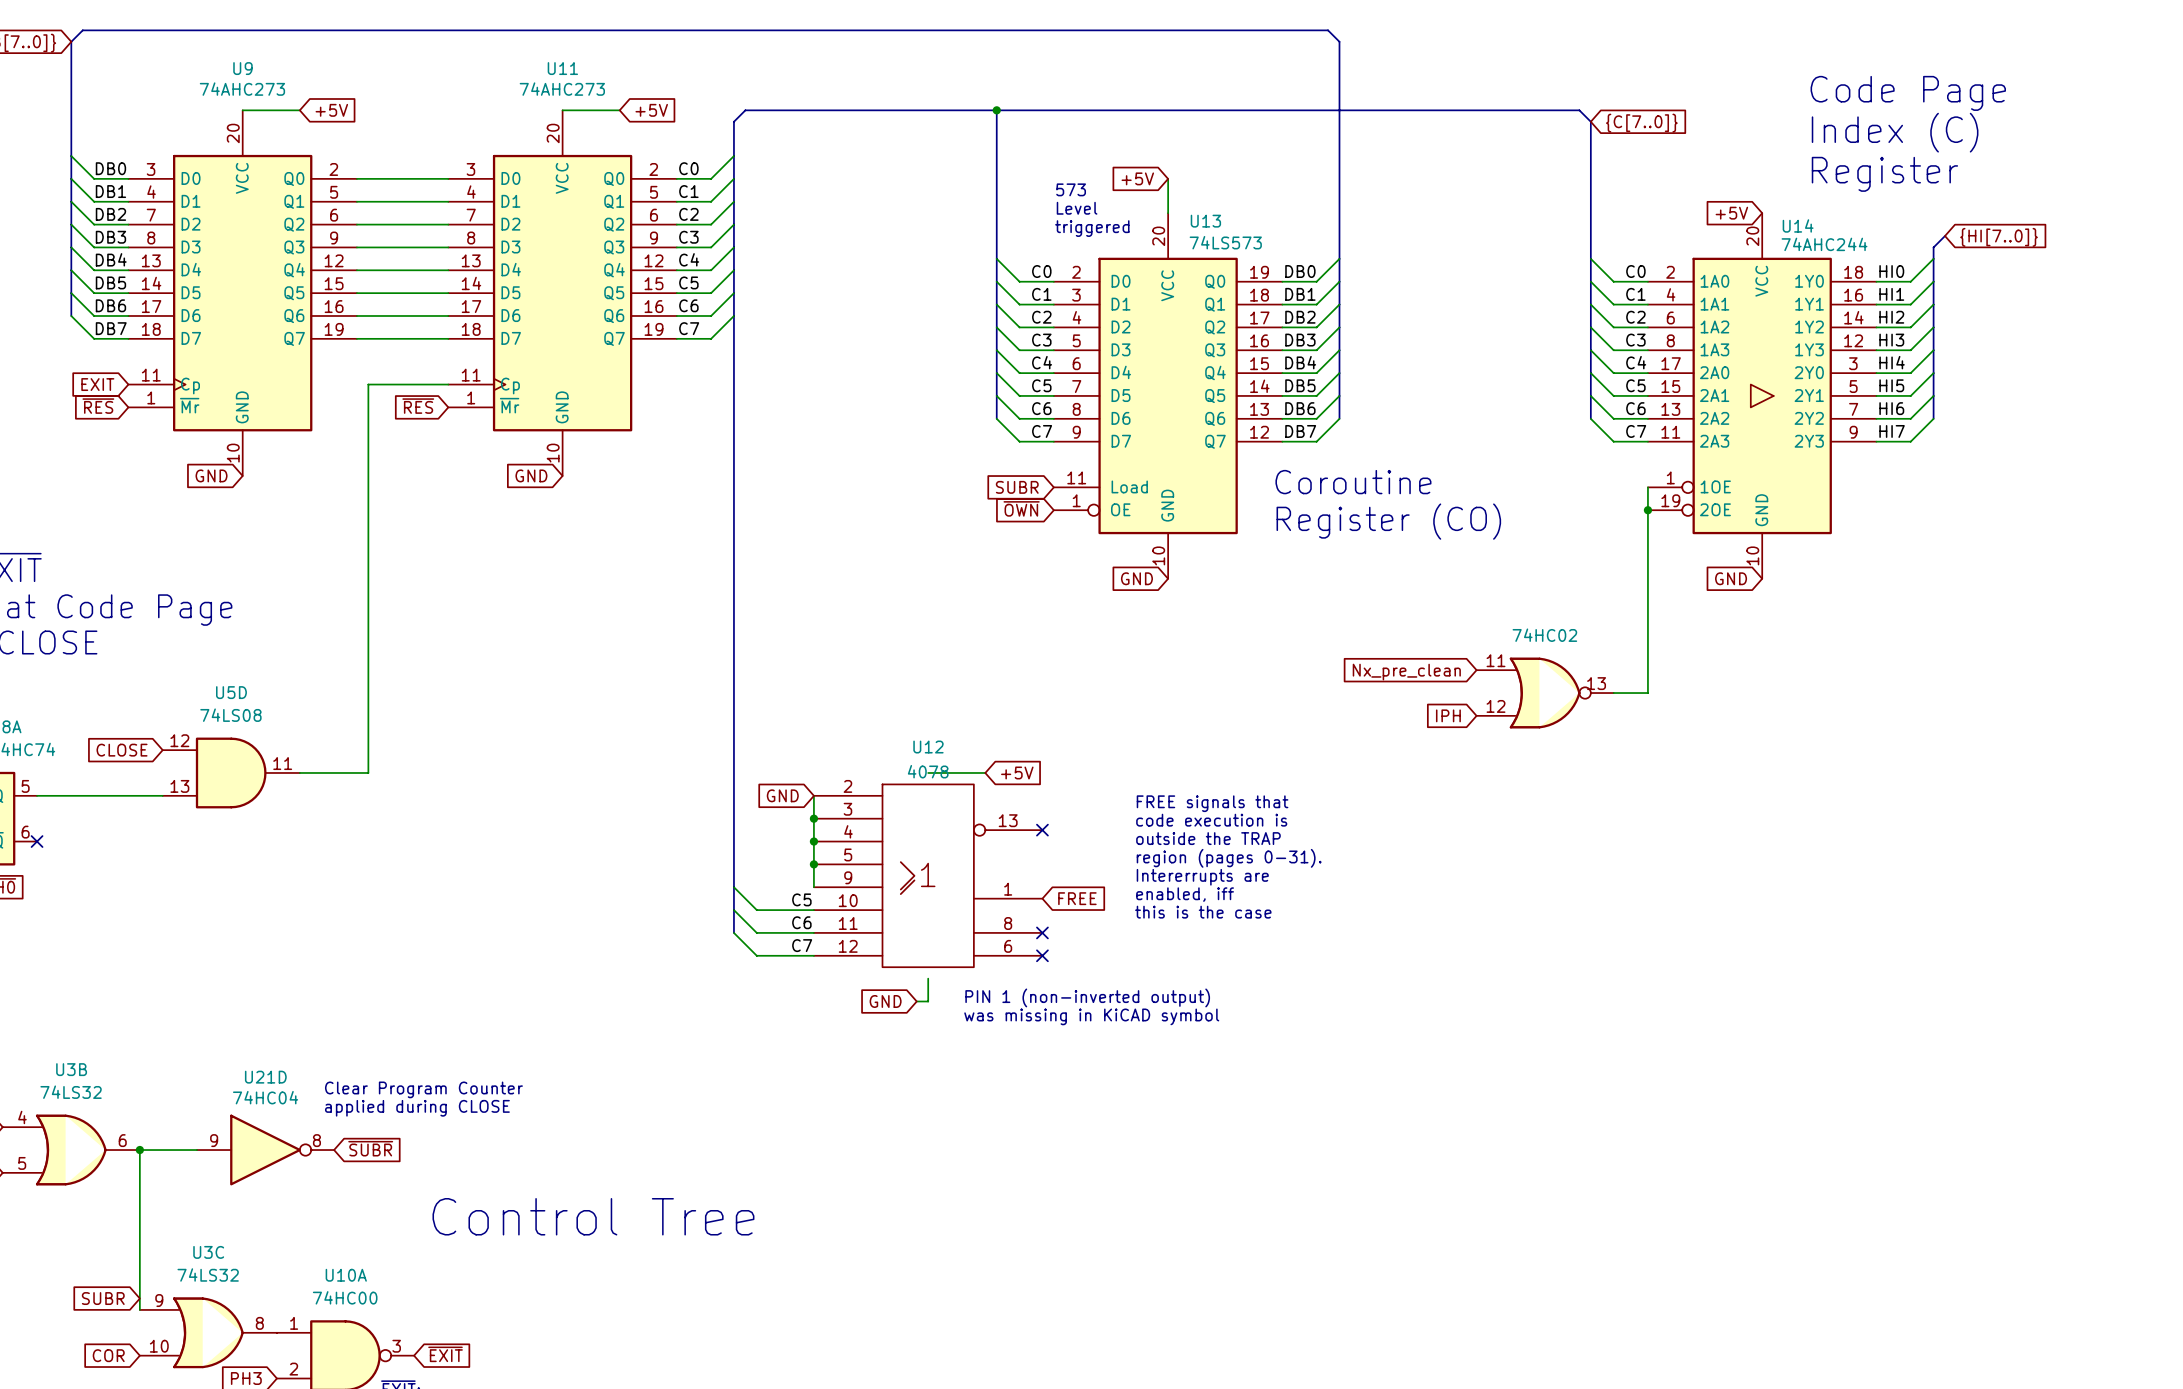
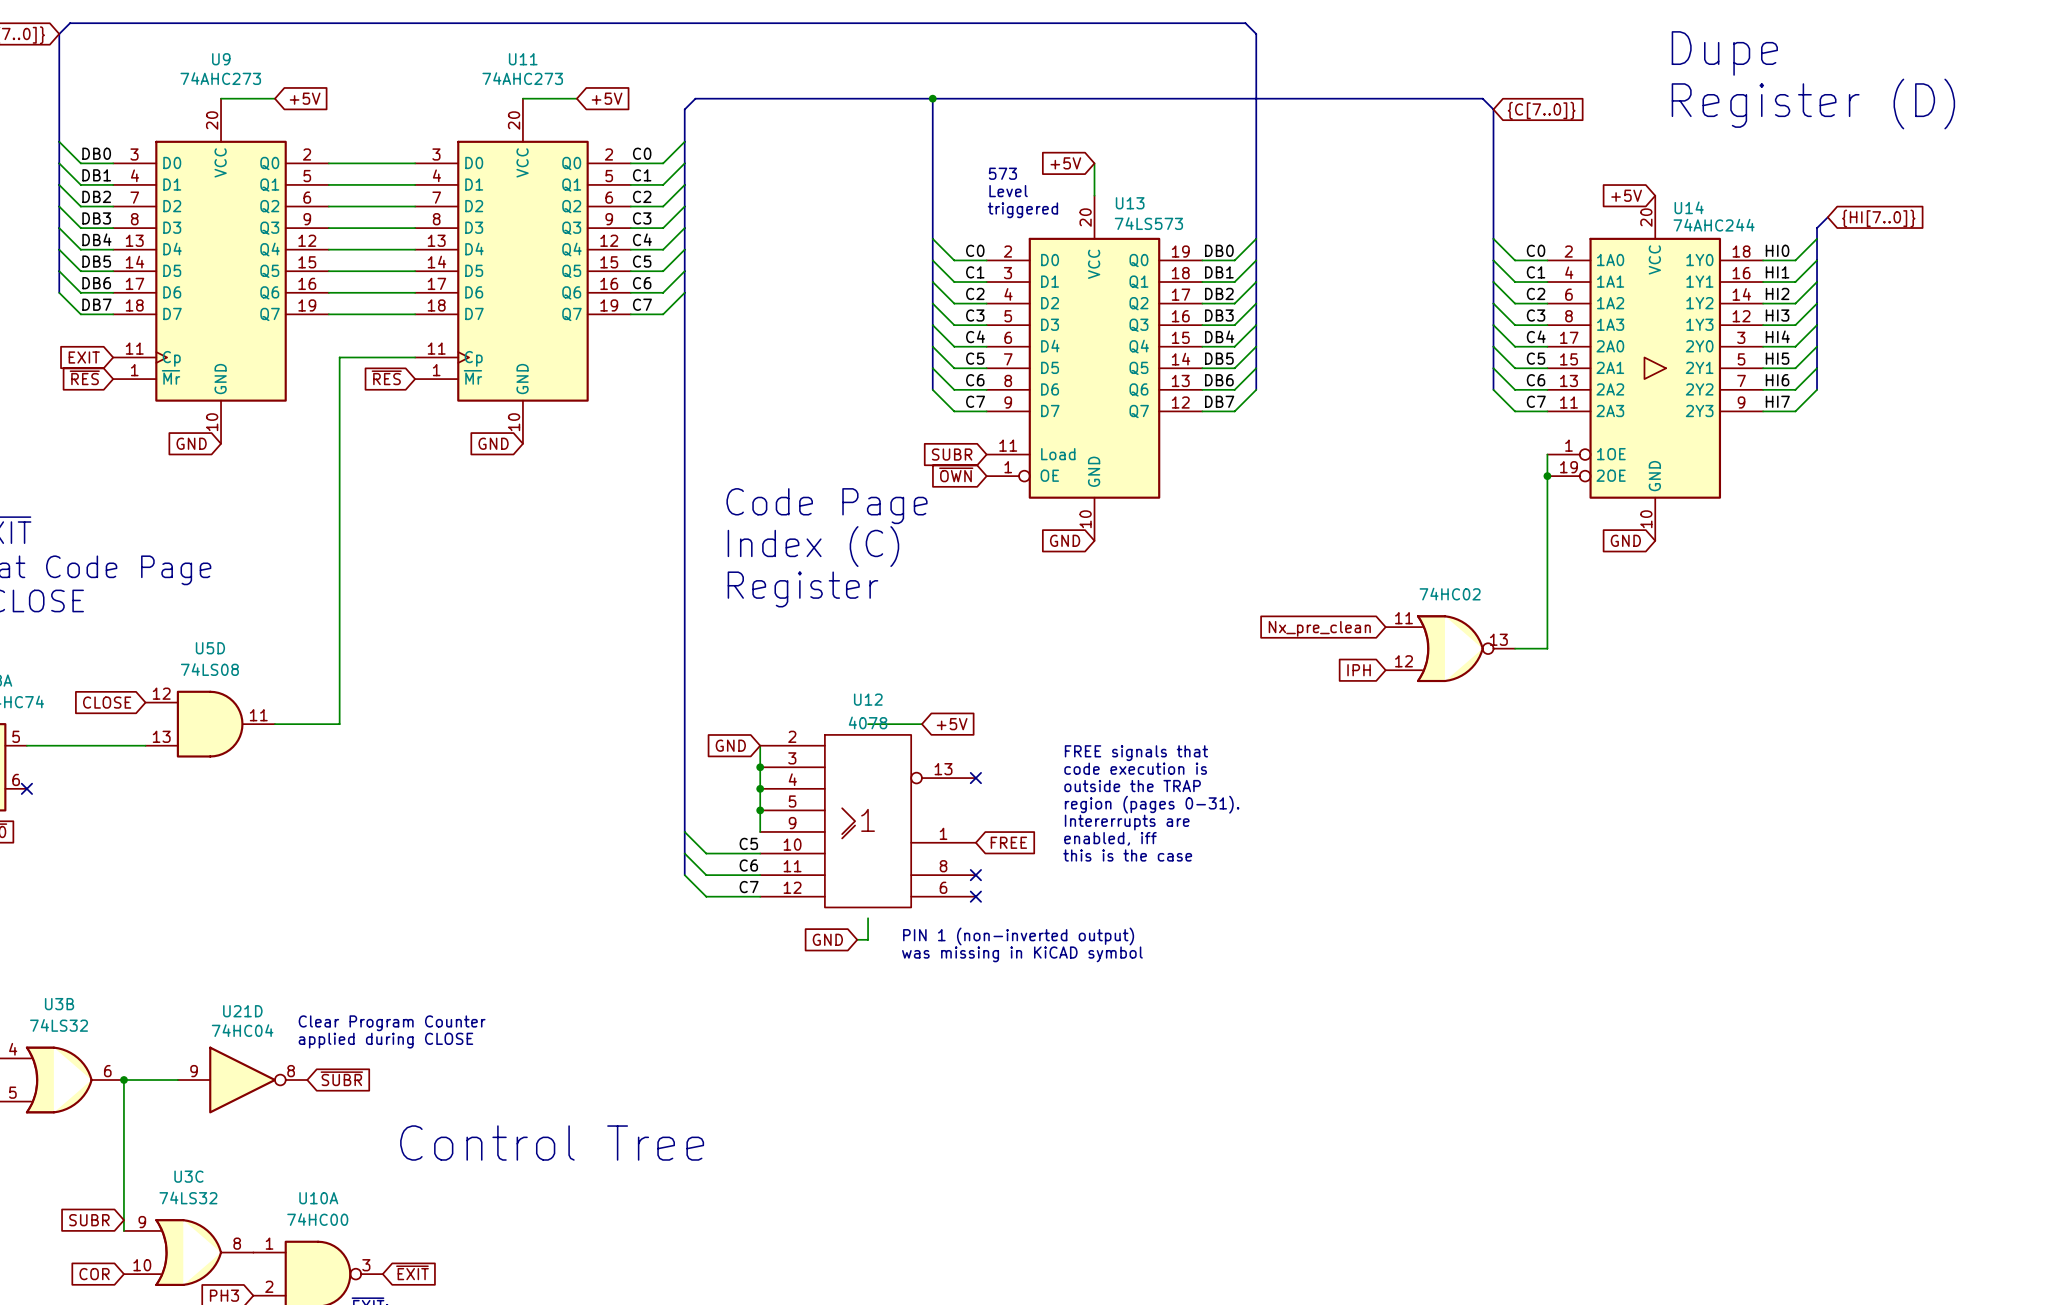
text: none -> Dupe (1724, 53)
text: Code Page (1908, 93) -> none
text: Index (C) (1895, 132) -> none
text: Register (1884, 174) -> Register (D) (1813, 104)
text: Coroutine (1353, 482) -> none
text: Register (CO) (1388, 521) -> none
text: none -> Code Page (826, 506)
text: none -> Index (C) (813, 546)
text: none -> Register (802, 589)

